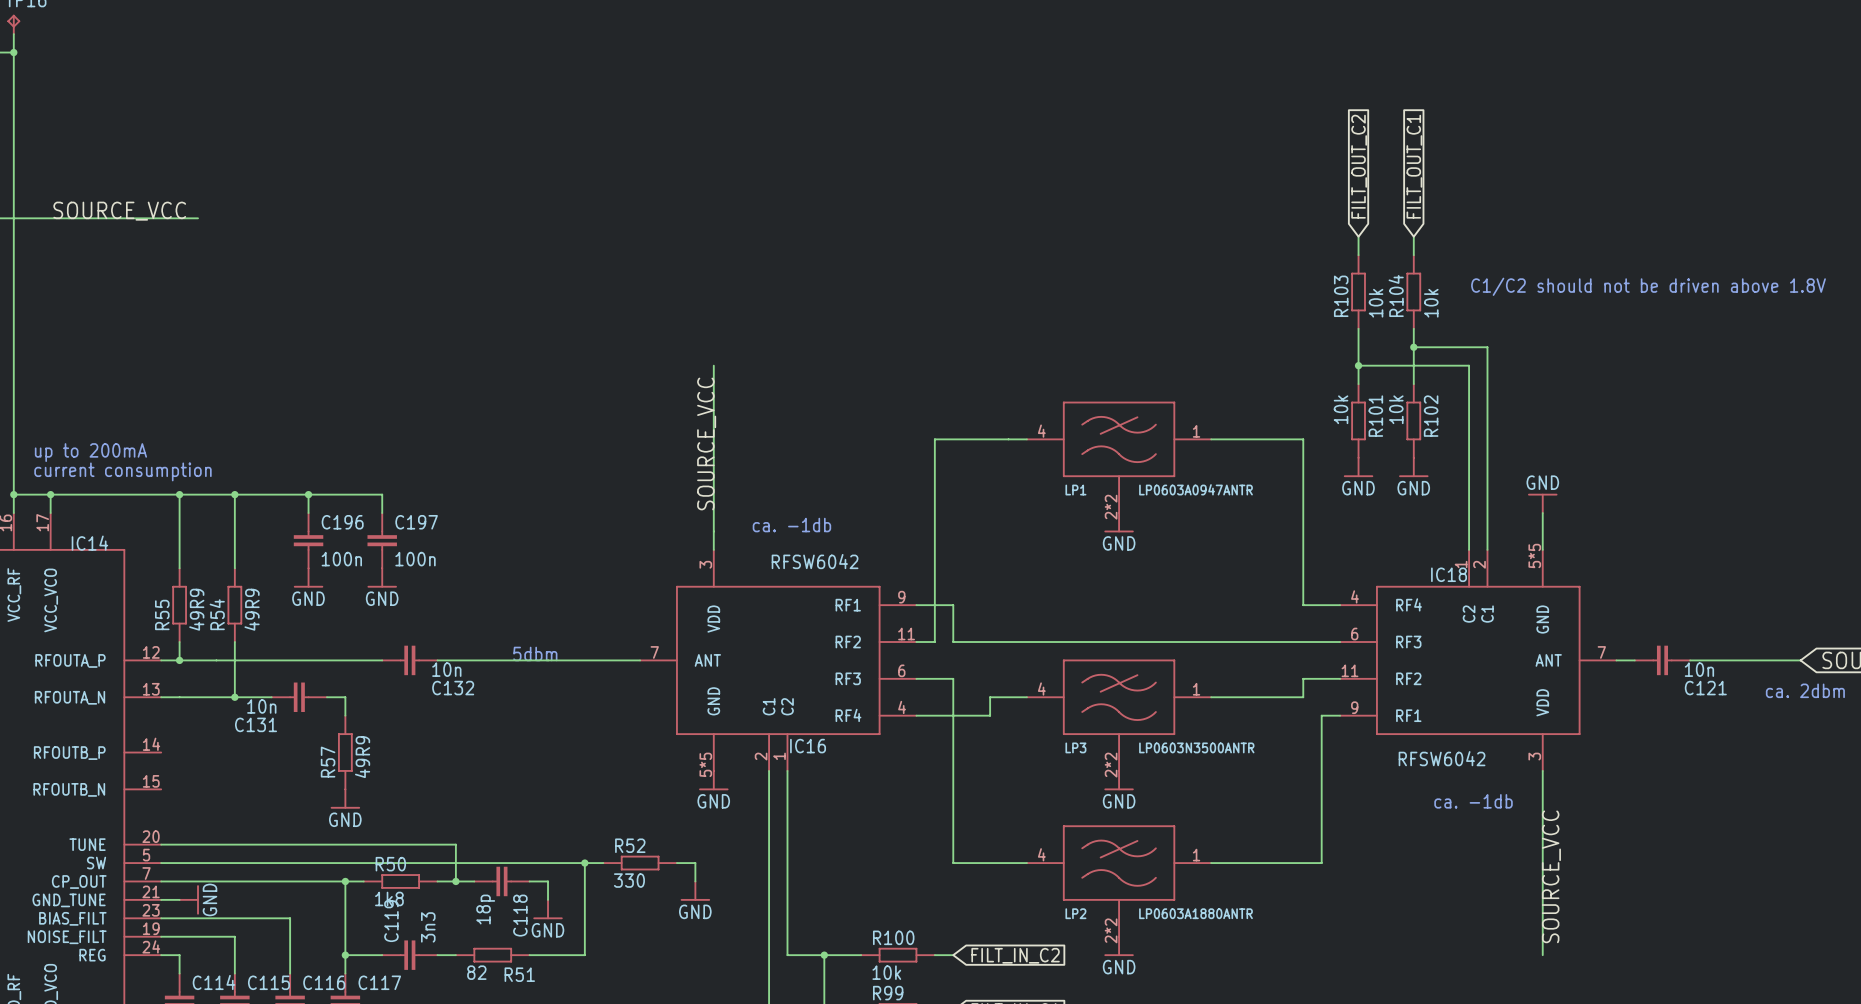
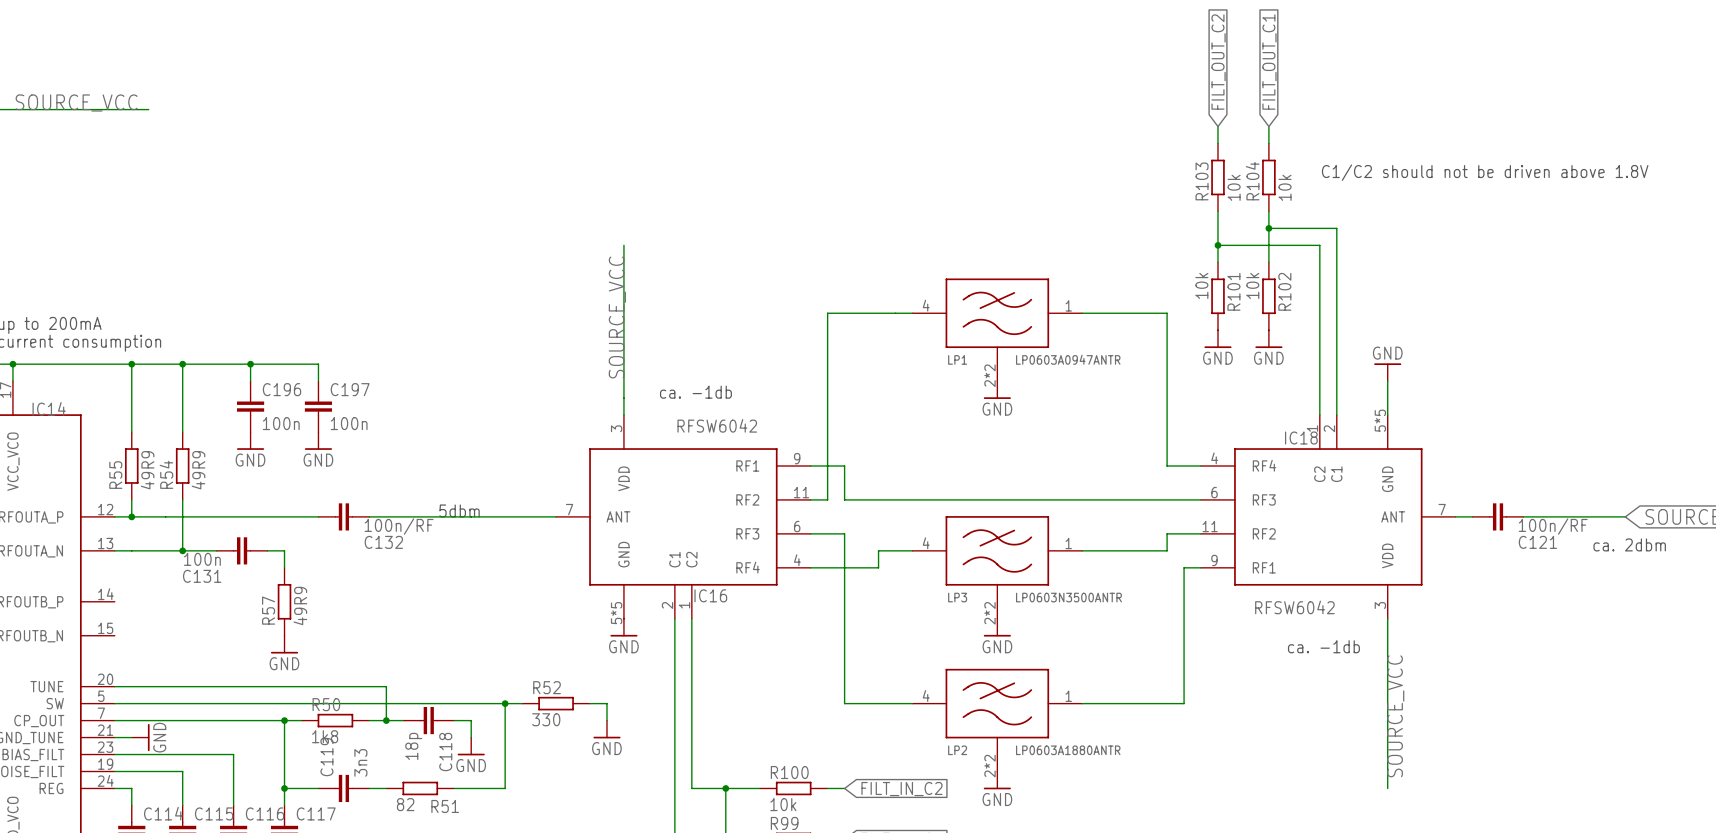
C132 value: 10n (446, 669) -> 100n/RF (399, 526)
C121 value: 10n (1699, 669) -> 100n/RF (1553, 526)
C131 value: 10n (261, 706) -> 100n (202, 559)

